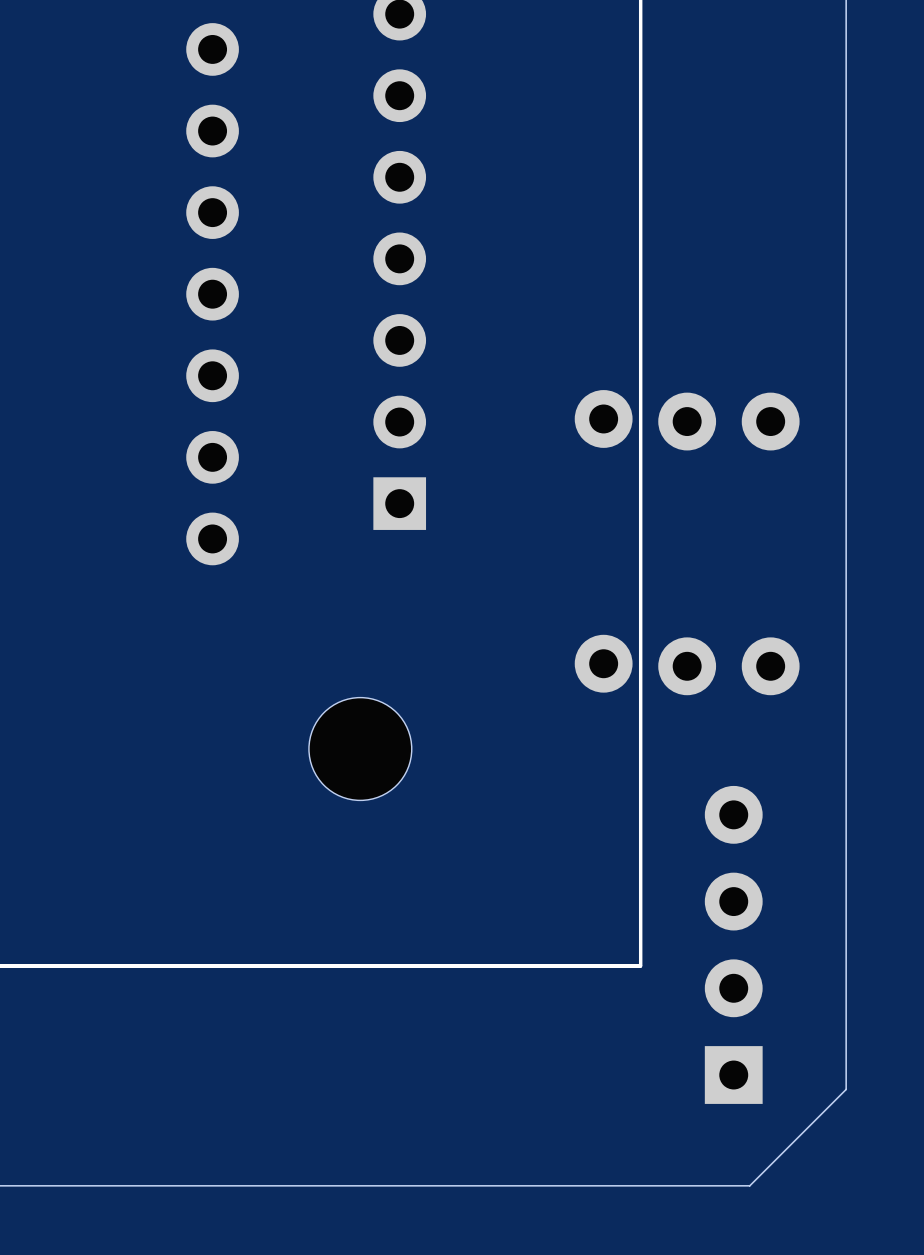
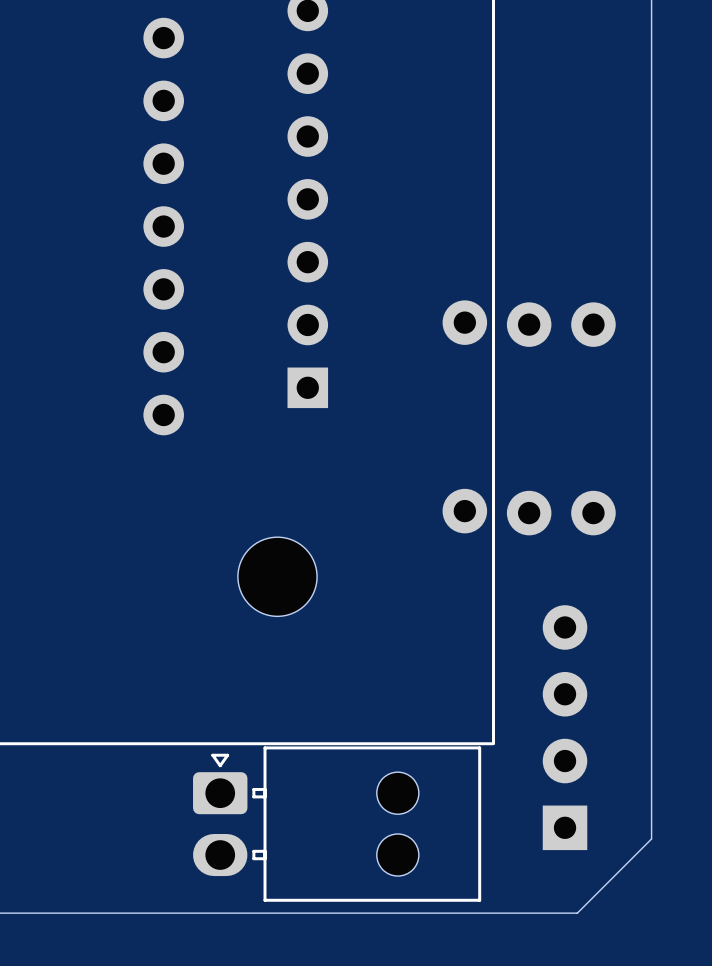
part: none -> (337, 824)

